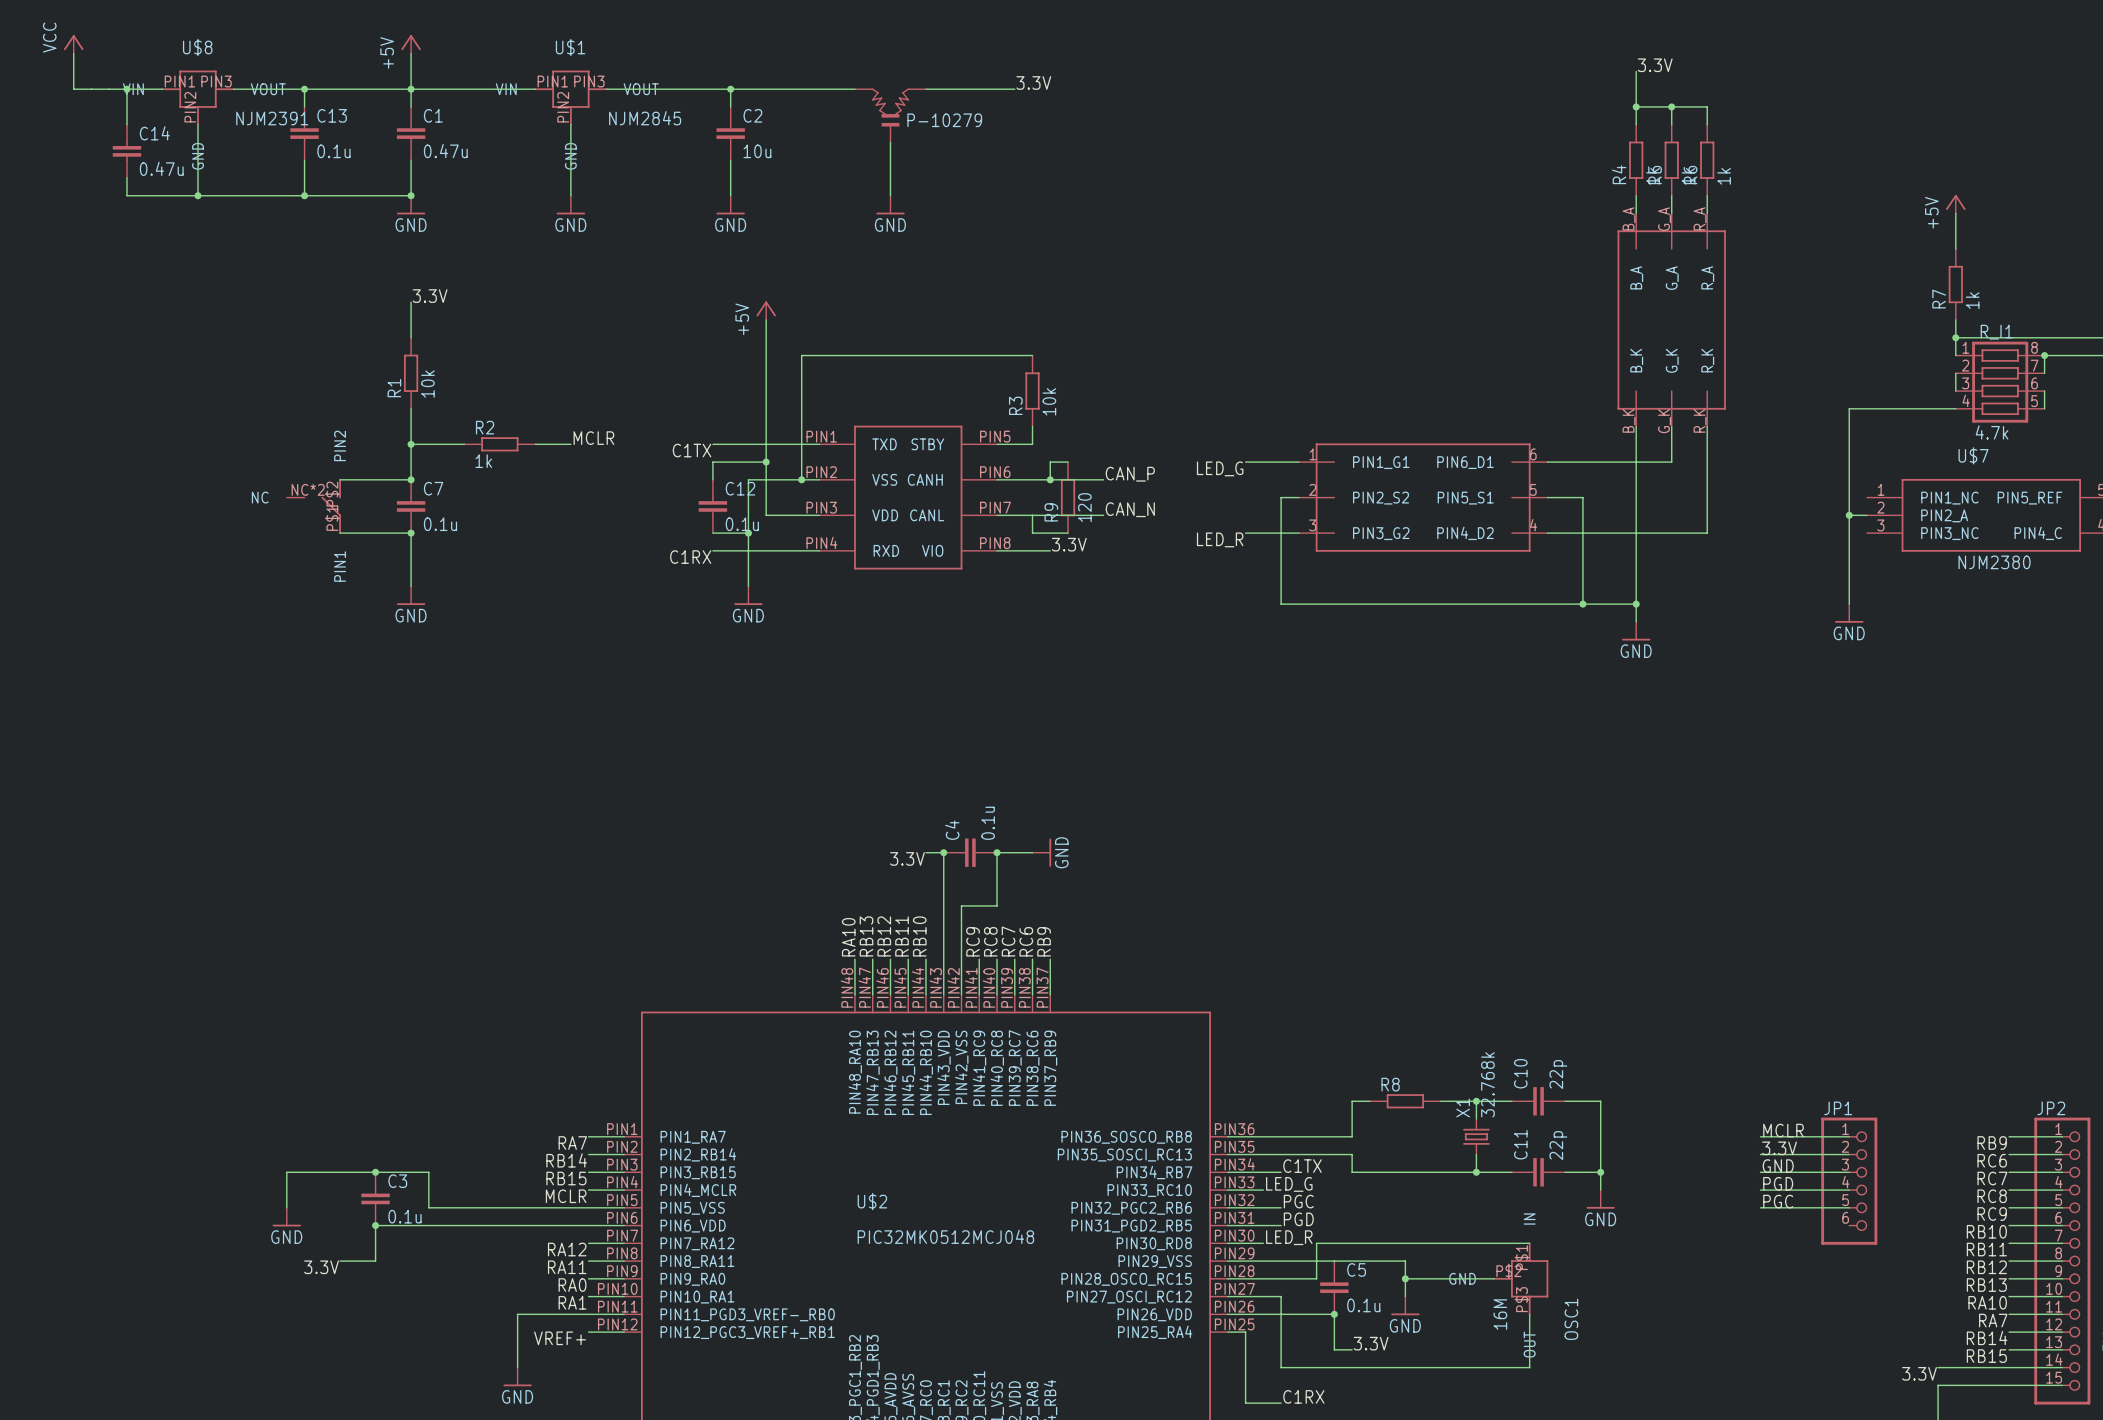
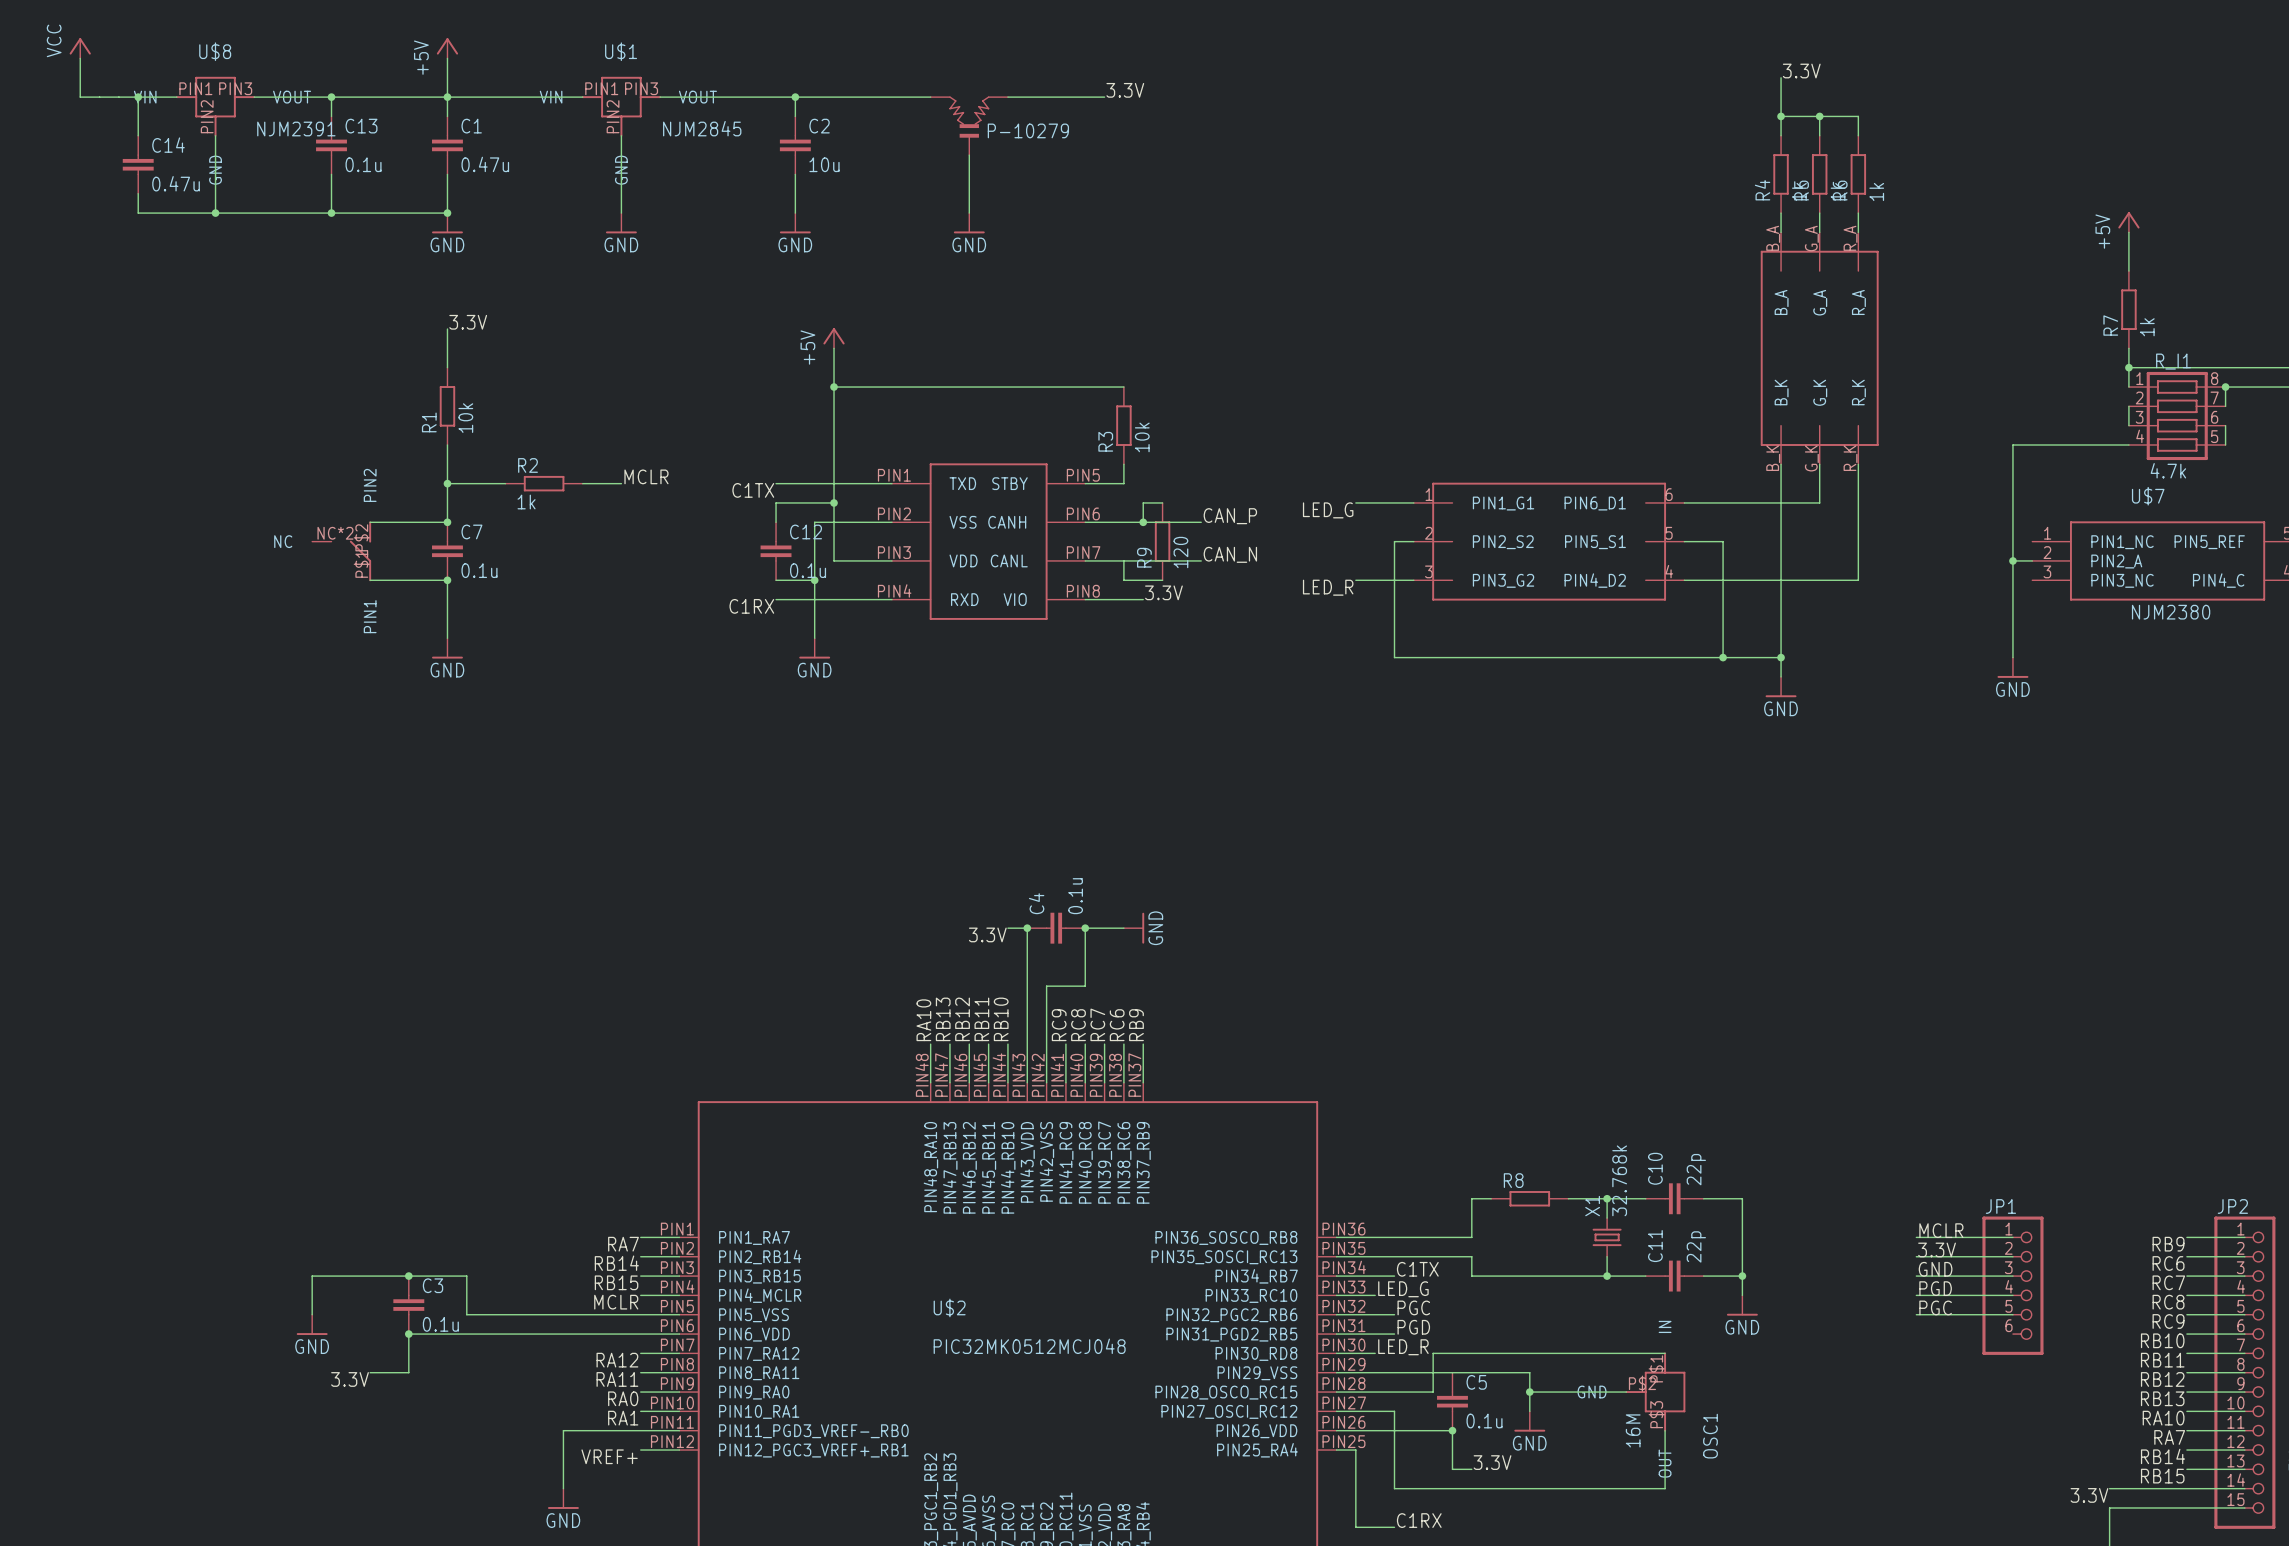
junction: none -> (834, 387)
wire: (801, 355) (801, 479) -> (872, 387) (834, 387)
junction: (801, 479) -> none

